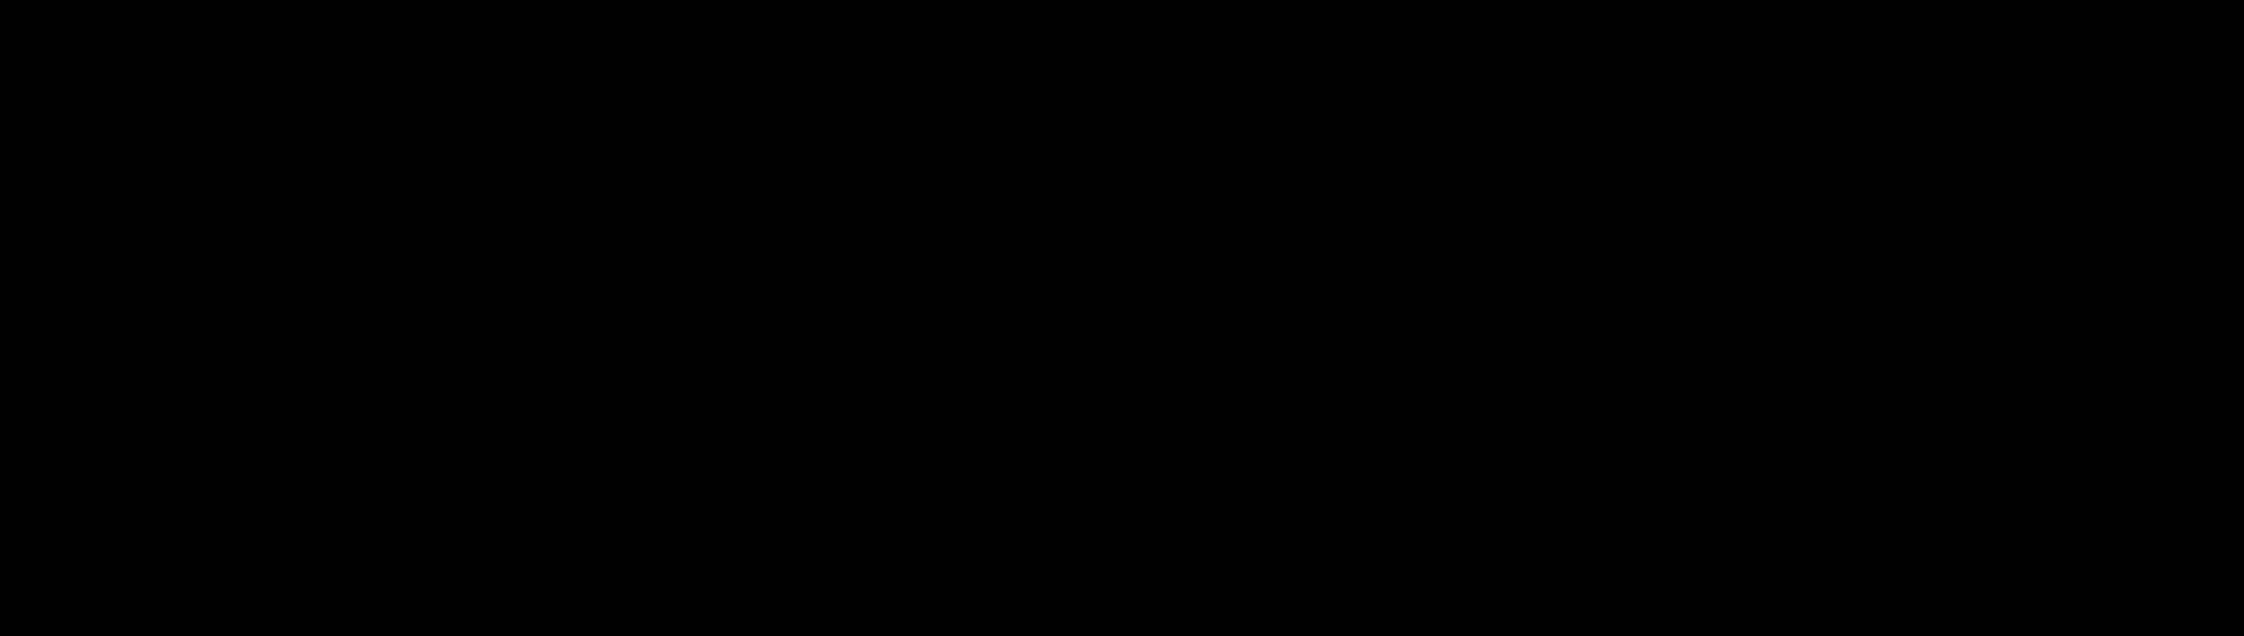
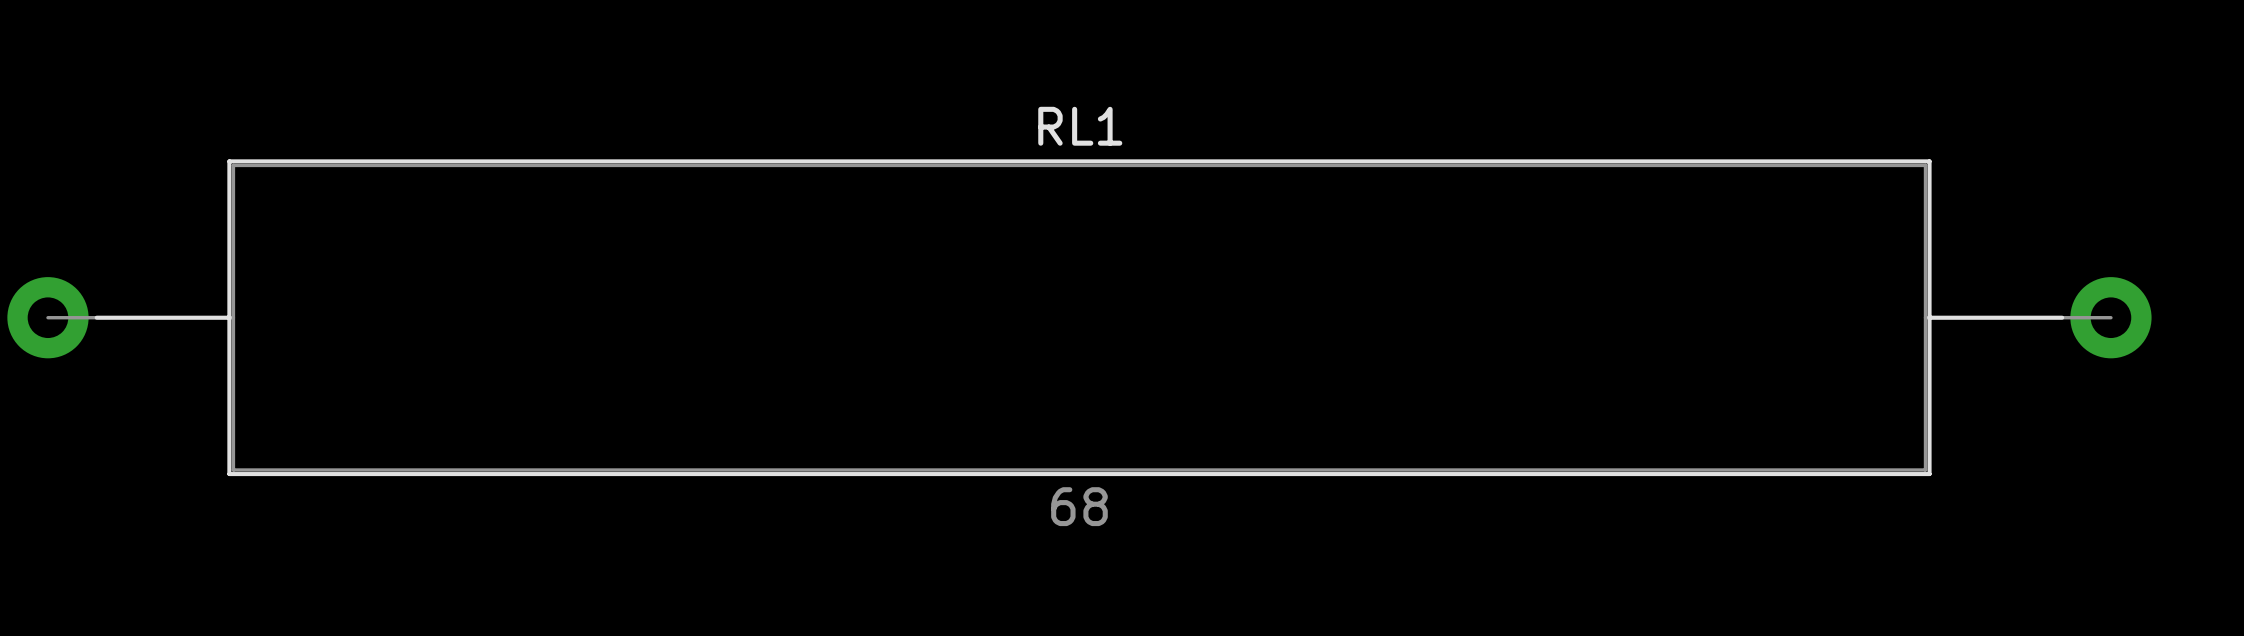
RL1: none -> 68 (1079, 317)

